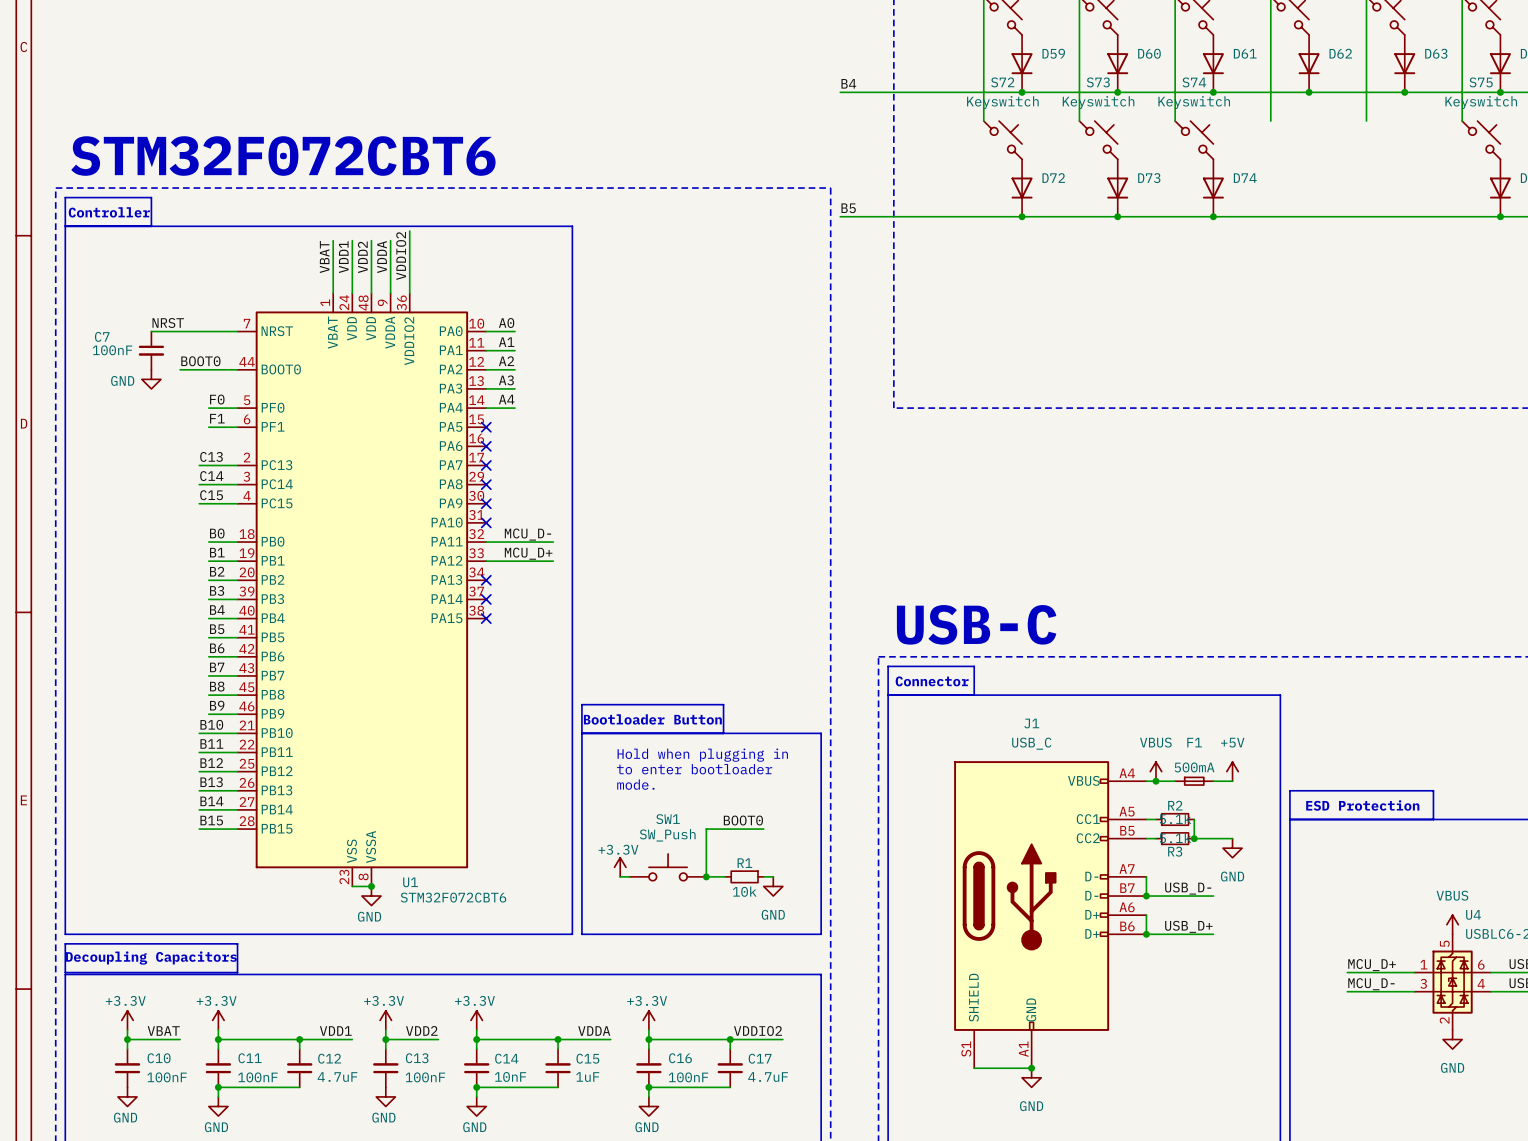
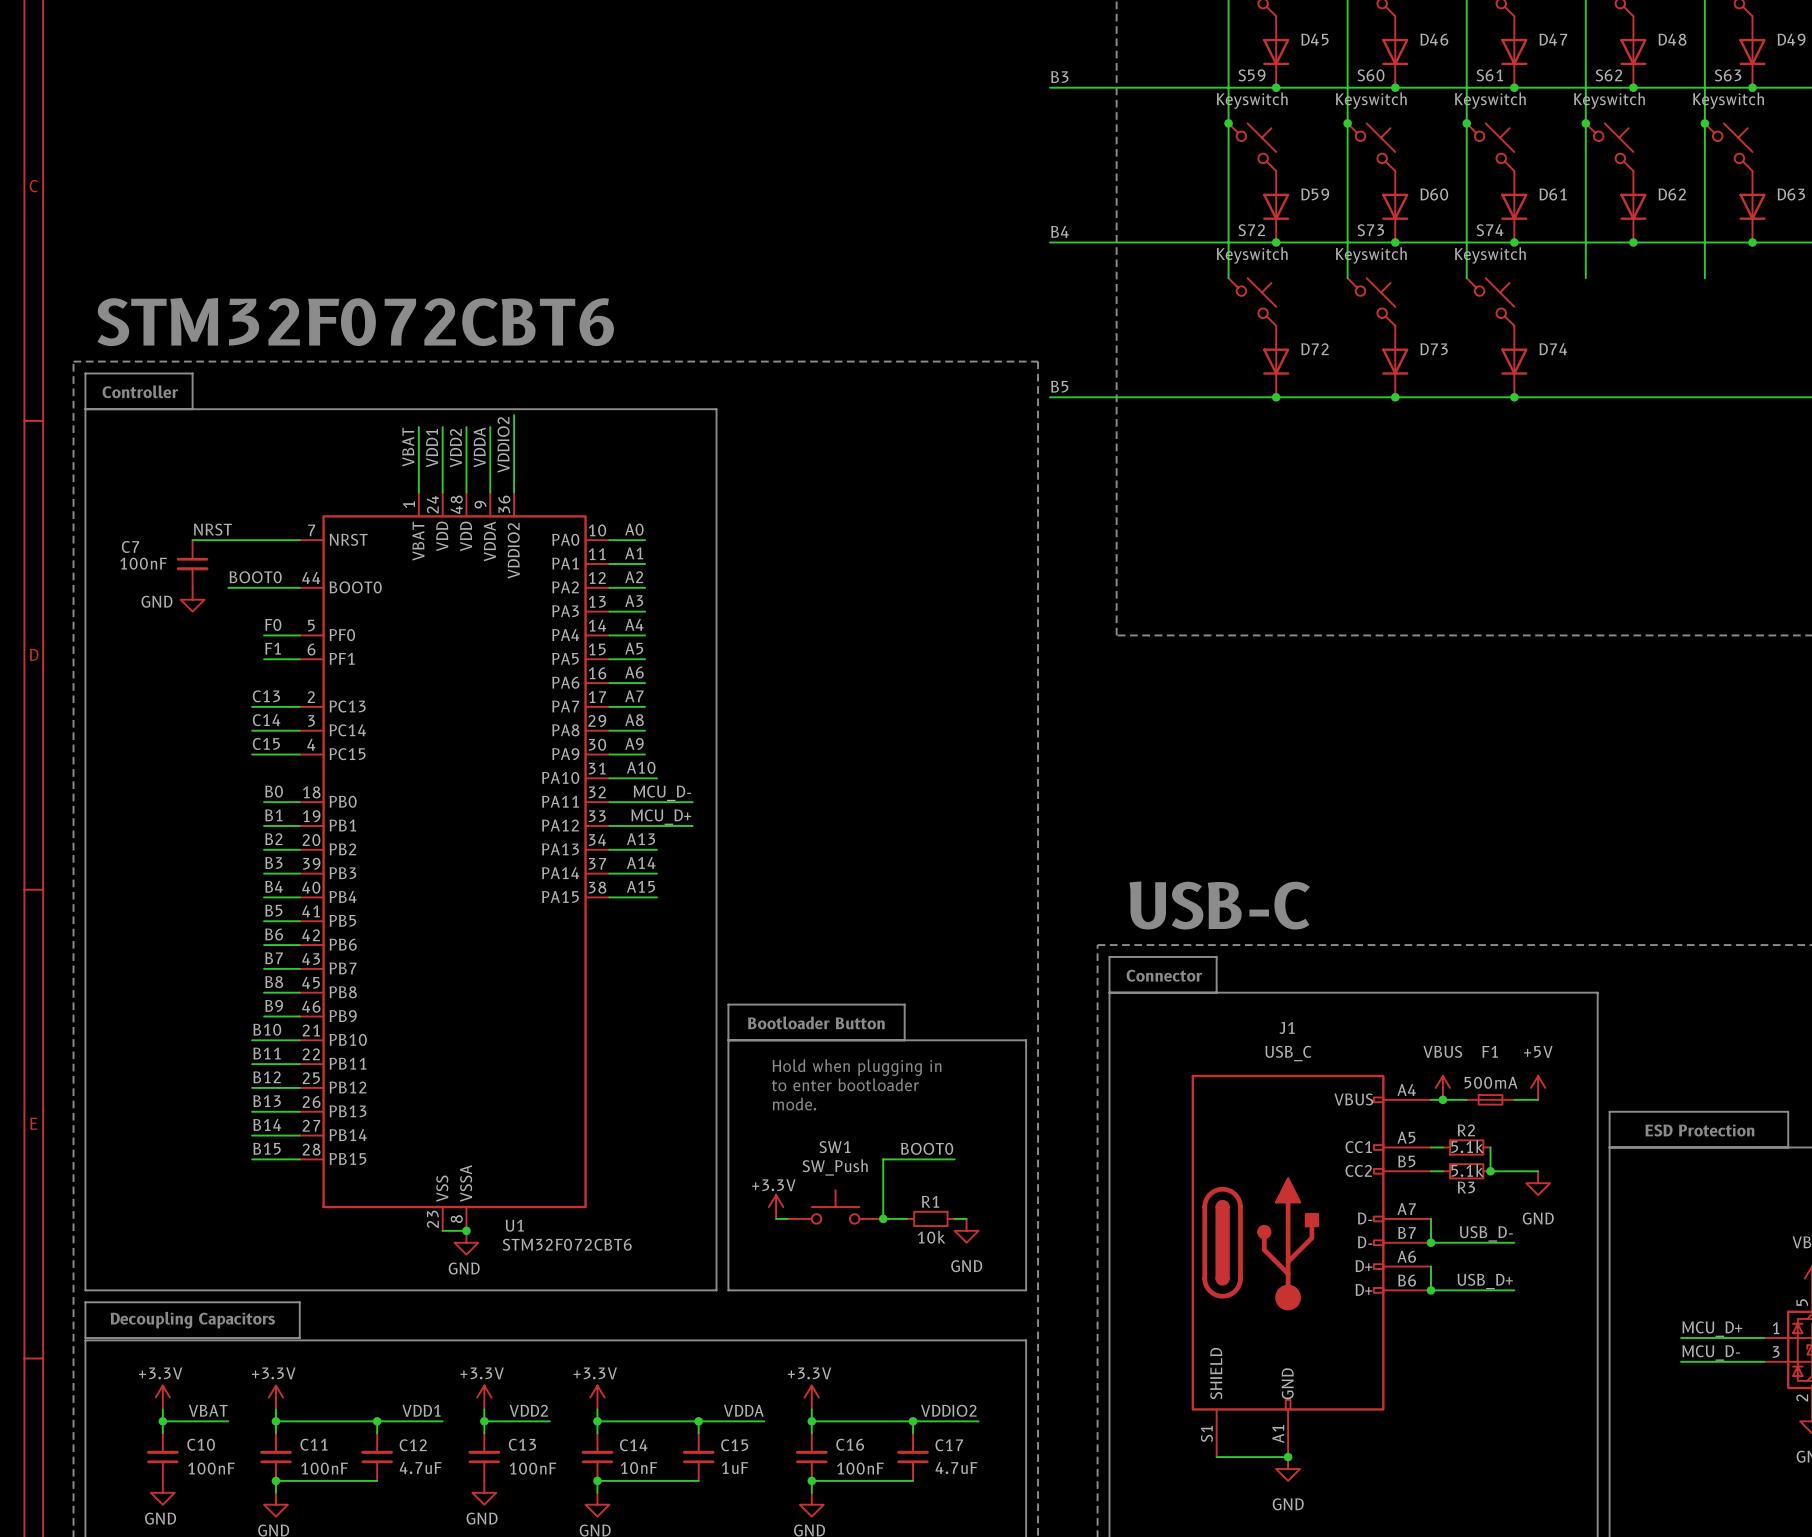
label: none -> A5 (634, 648)
wire: none -> (609, 659) (645, 659)
no-connect mark: (486, 427) -> none
label: none -> A6 (634, 672)
wire: none -> (609, 683) (645, 683)
no-connect mark: (486, 446) -> none
label: none -> A7 (634, 696)
wire: none -> (609, 706) (645, 706)
no-connect mark: (486, 465) -> none
label: none -> A8 (634, 720)
wire: none -> (609, 730) (645, 730)
no-connect mark: (486, 484) -> none
label: none -> A9 (634, 743)
wire: none -> (609, 754) (645, 754)
no-connect mark: (486, 503) -> none
label: none -> A10 (641, 767)
wire: none -> (609, 778) (656, 778)
no-connect mark: (486, 522) -> none
label: none -> A13 (641, 839)
wire: none -> (609, 849) (656, 849)
no-connect mark: (486, 580) -> none
label: none -> A14 (641, 862)
wire: none -> (609, 873) (656, 873)
no-connect mark: (486, 599) -> none
label: none -> A15 (640, 886)
wire: none -> (609, 897) (656, 897)
no-connect mark: (486, 618) -> none

